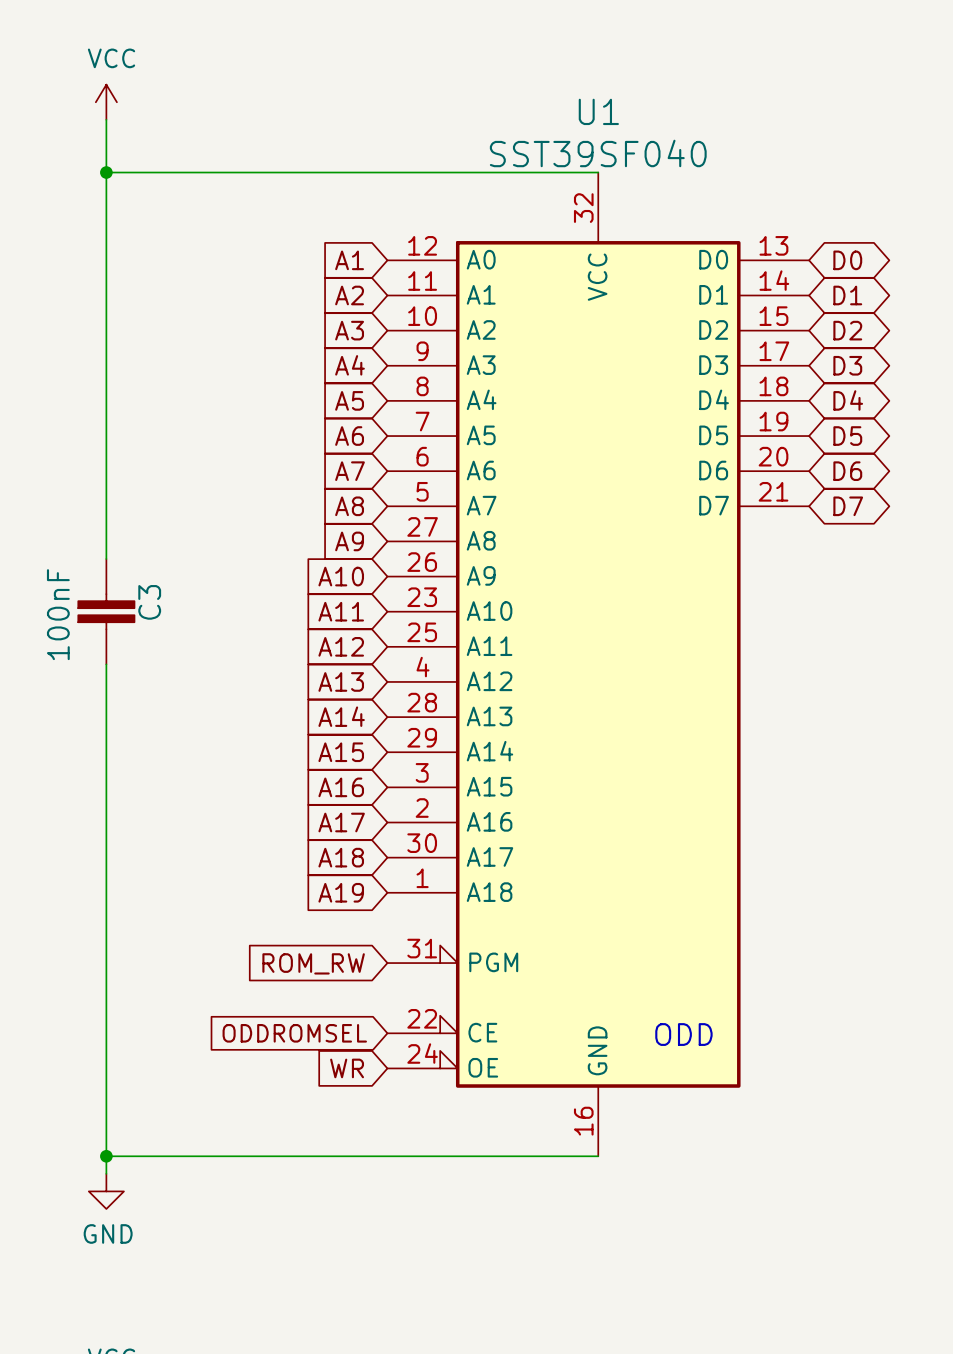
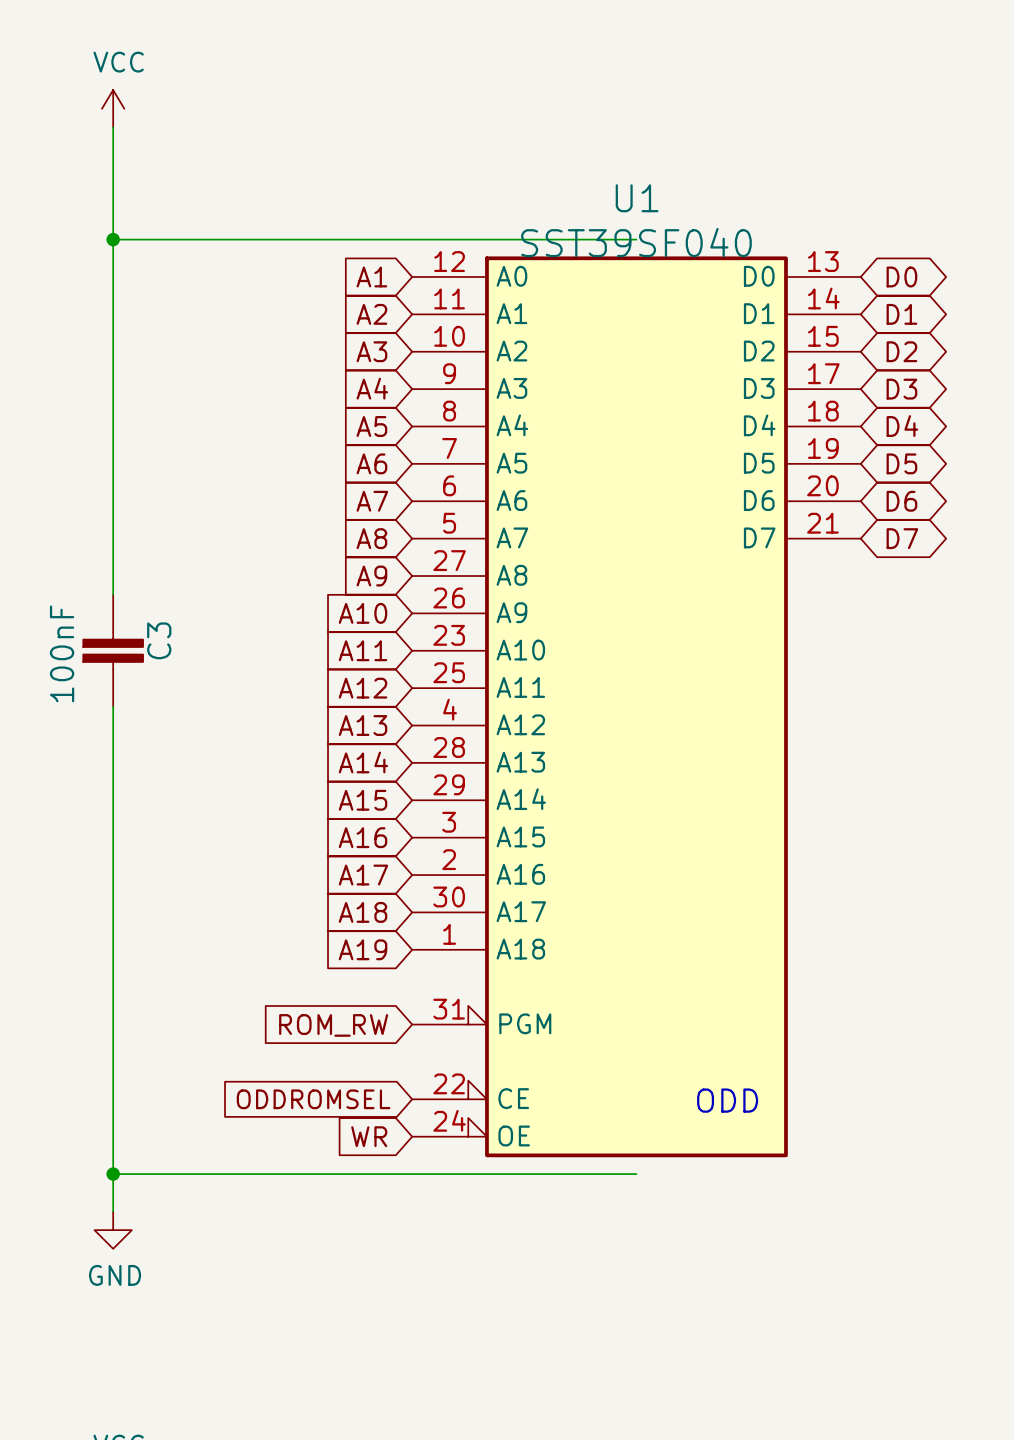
U1 name position: U1 (598, 111) -> U1 (637, 198)
U1 value position: SST39SF040 (598, 153) -> SST39SF040 (636, 242)
wire: (106, 172) (598, 172) -> (113, 239) (636, 239)
junction position: (106, 172) -> (113, 239)
U1 symbol: [387, 172, 810, 1157] -> [412, 256, 861, 1158]
wire: (106, 1156) (598, 1156) -> (113, 1174) (636, 1174)
junction position: (106, 1156) -> (113, 1174)
power symbol position: GND (106, 1191) -> GND (113, 1230)

